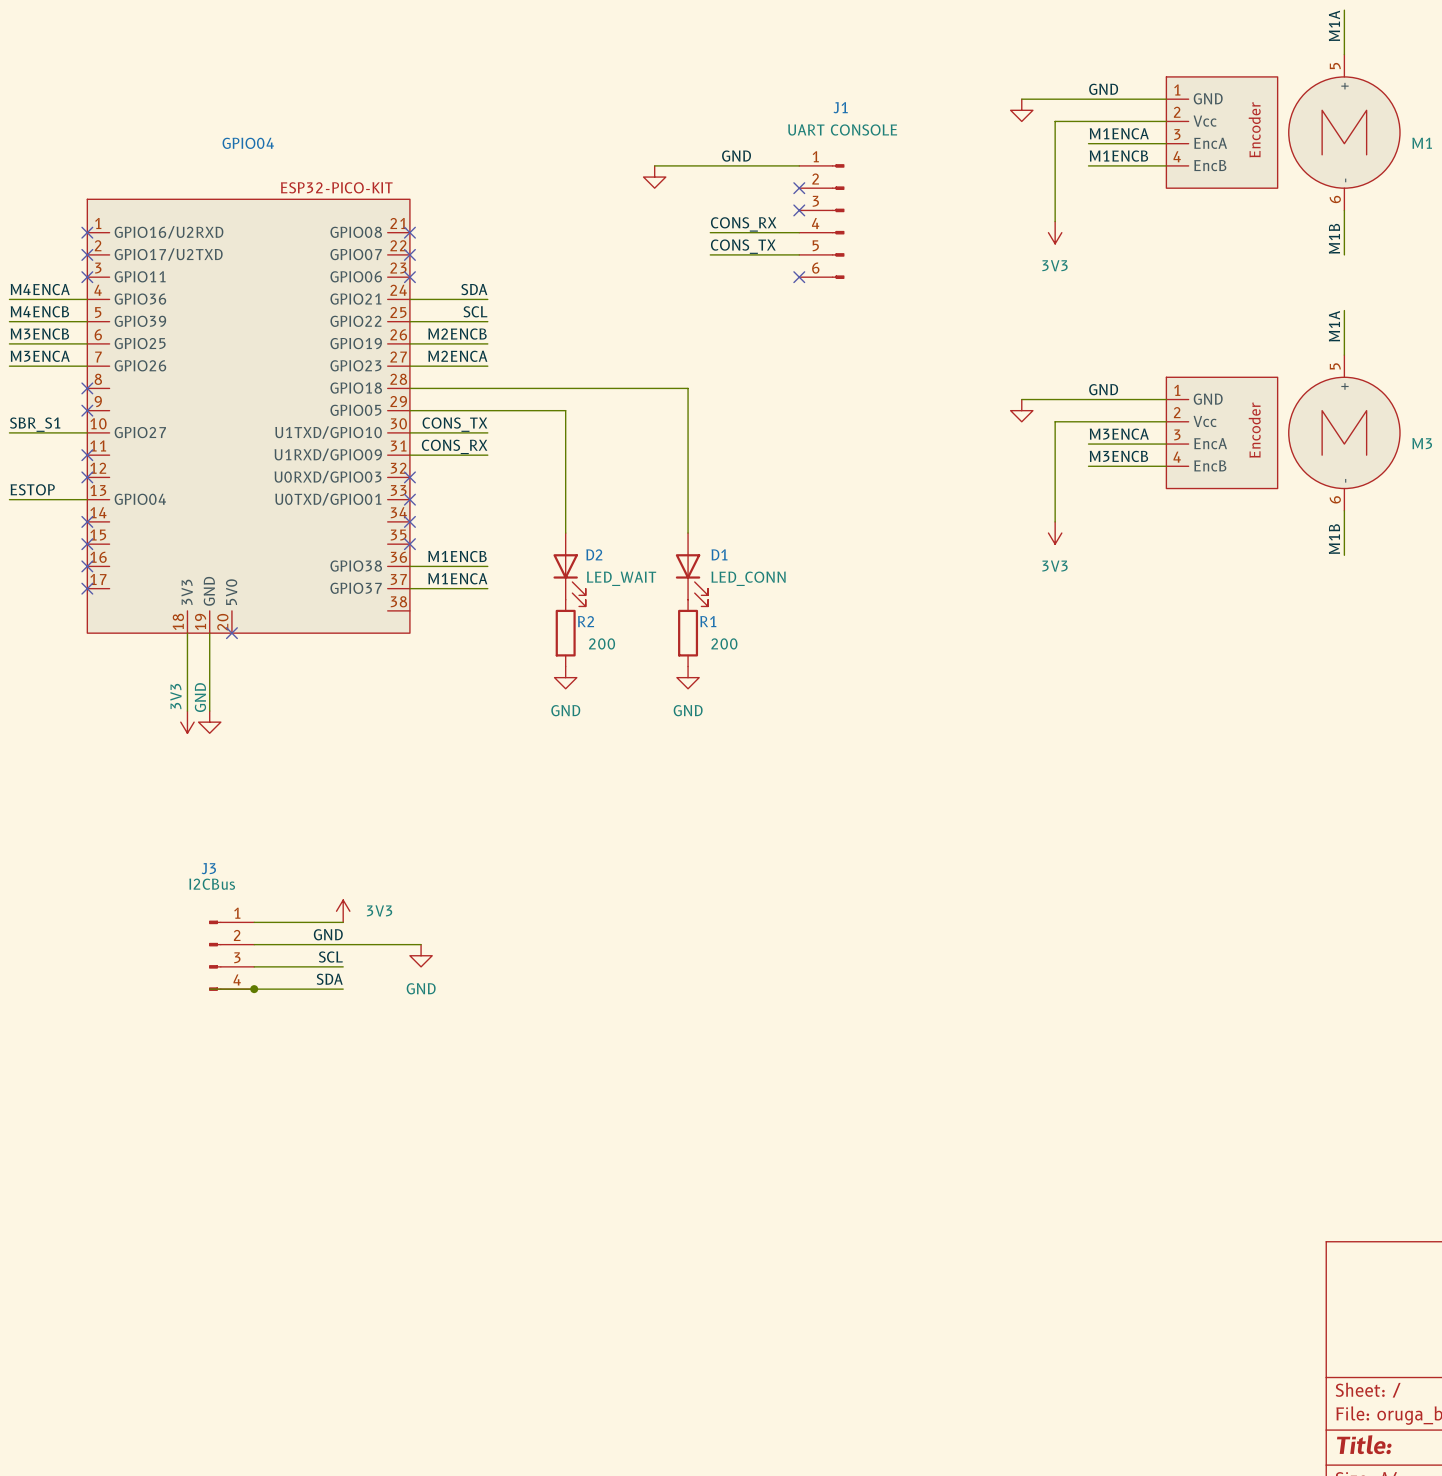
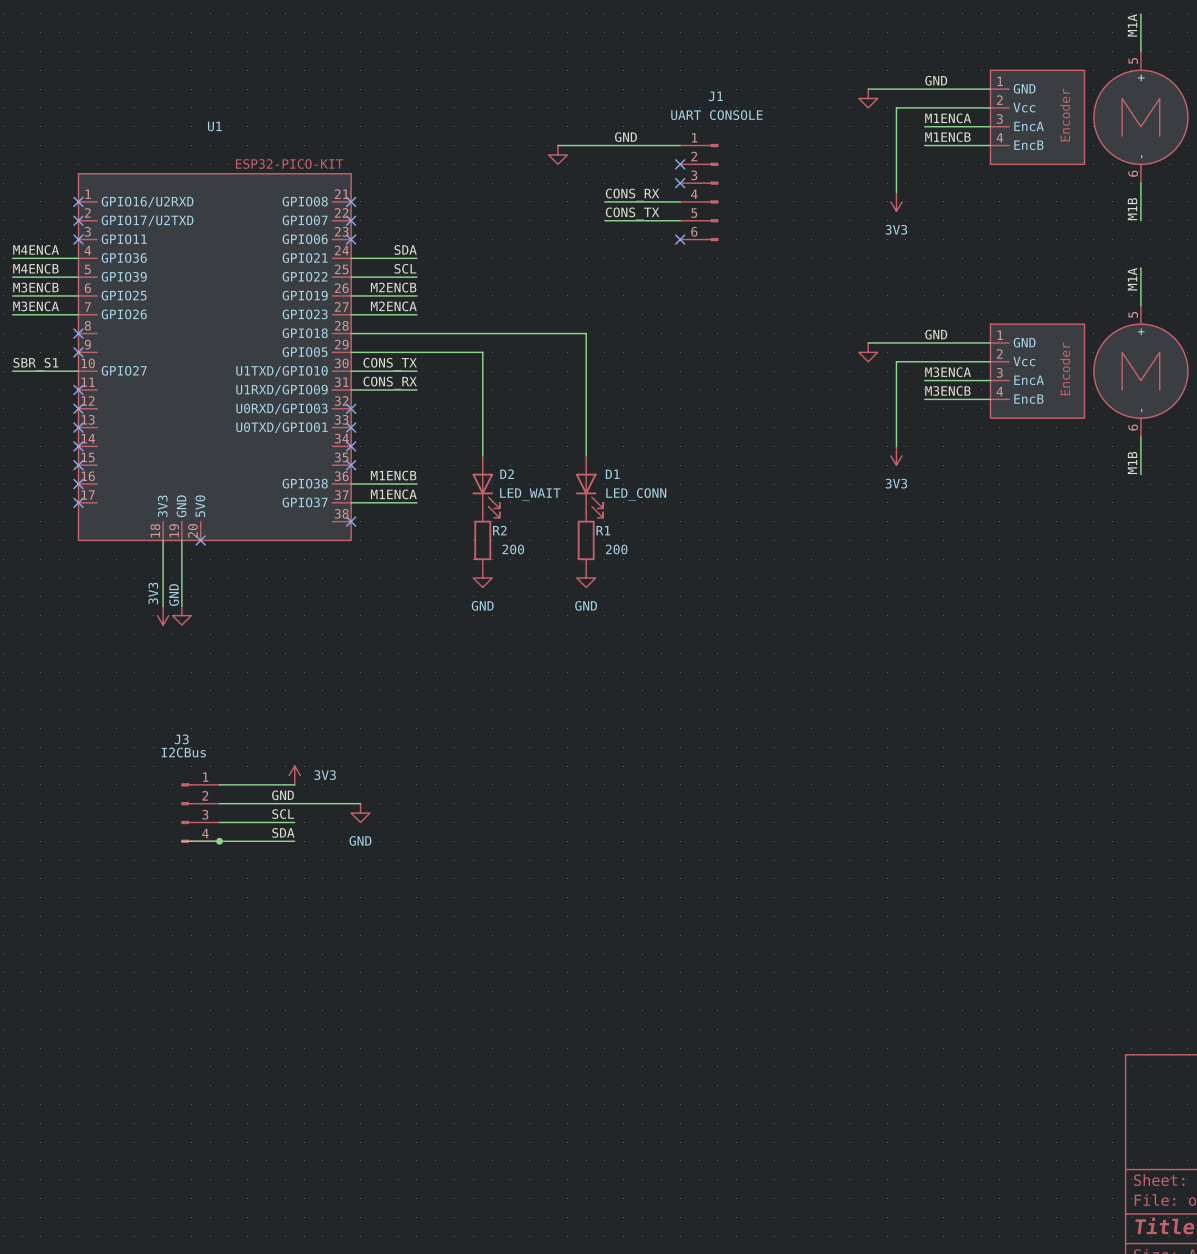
GPIO04 name: GPIO04 (248, 143) -> U1 (214, 126)
label: ESTOP (32, 489) -> none
wire: (9, 499) (87, 499) -> none
no-connect mark: none -> (78, 427)
GPIO04 pin name: GPIO04 (140, 499) -> none
no-connect mark: none -> (351, 521)

